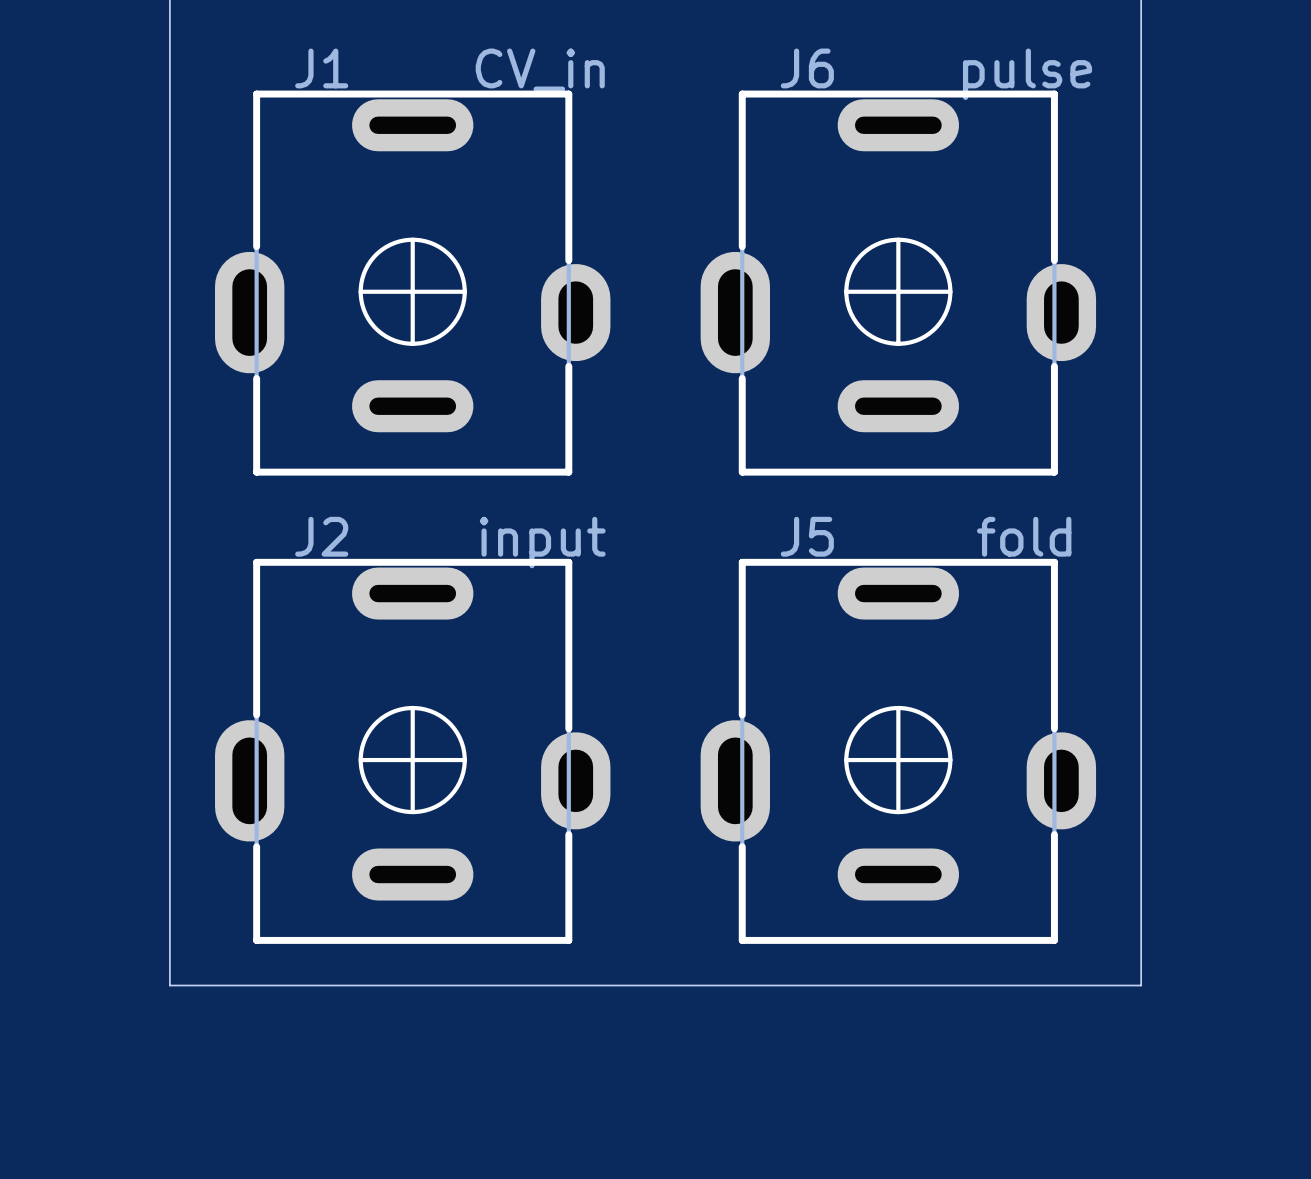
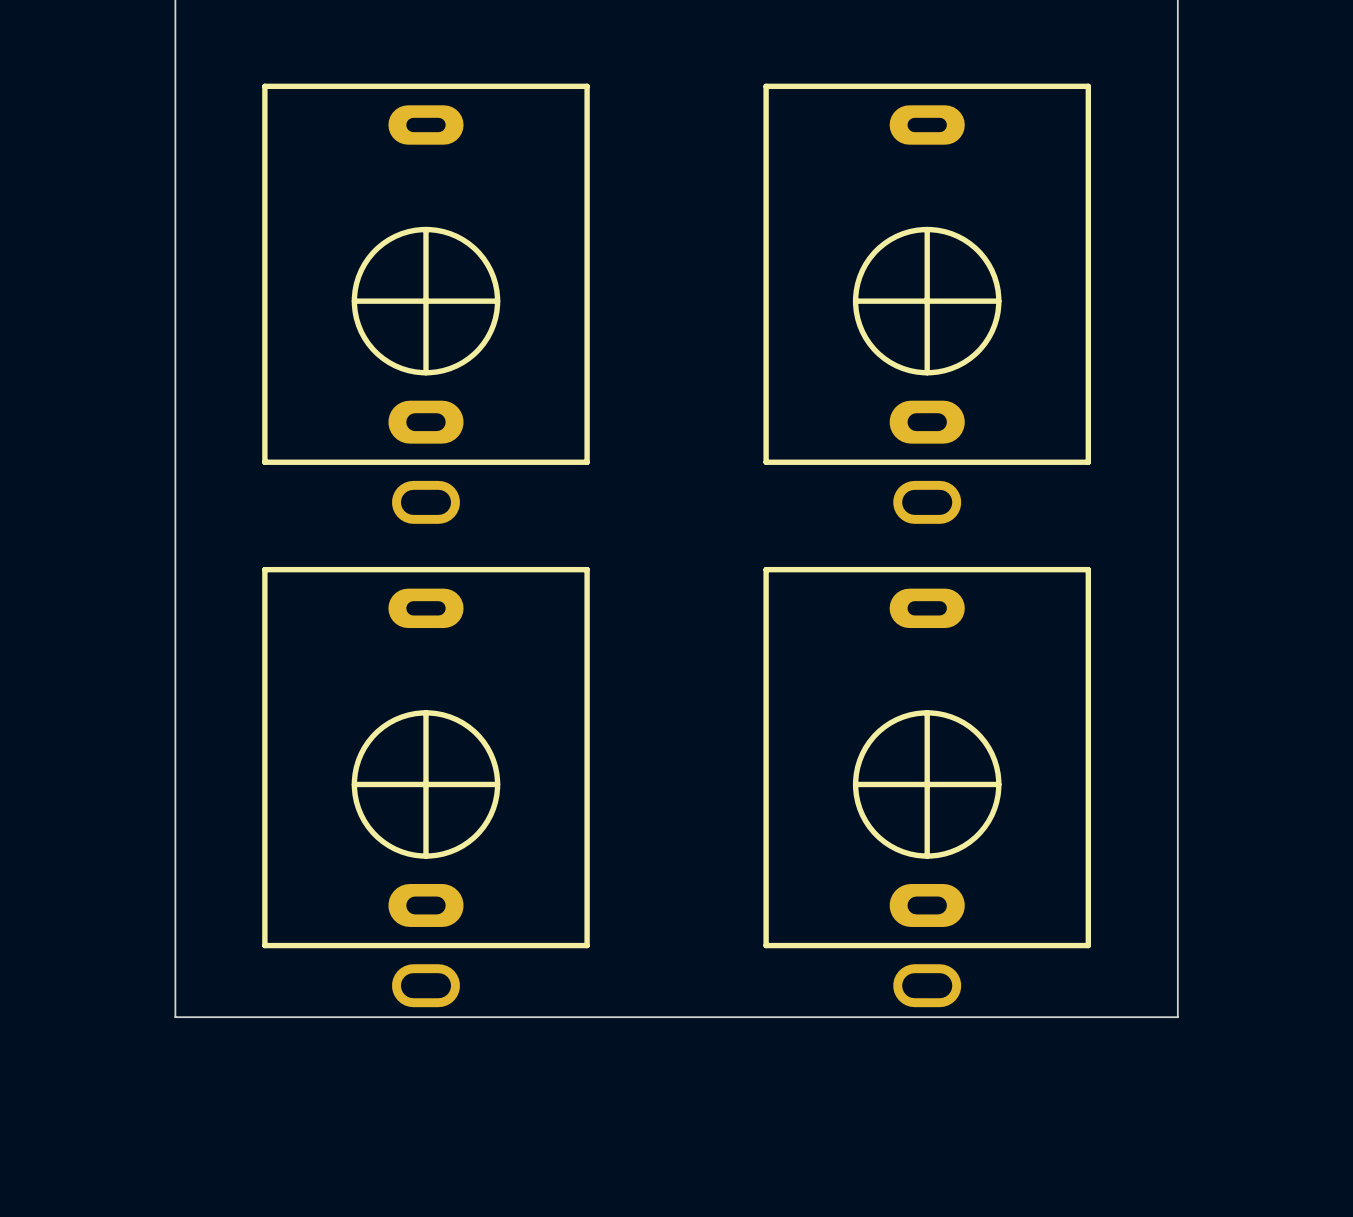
J1: CV_in (412, 283) -> none
J6: pulse (898, 283) -> none
part: none -> (425, 303)
part: none -> (927, 303)
J2: input (412, 751) -> none
J5: fold (898, 751) -> none
part: none -> (425, 787)
part: none -> (927, 787)

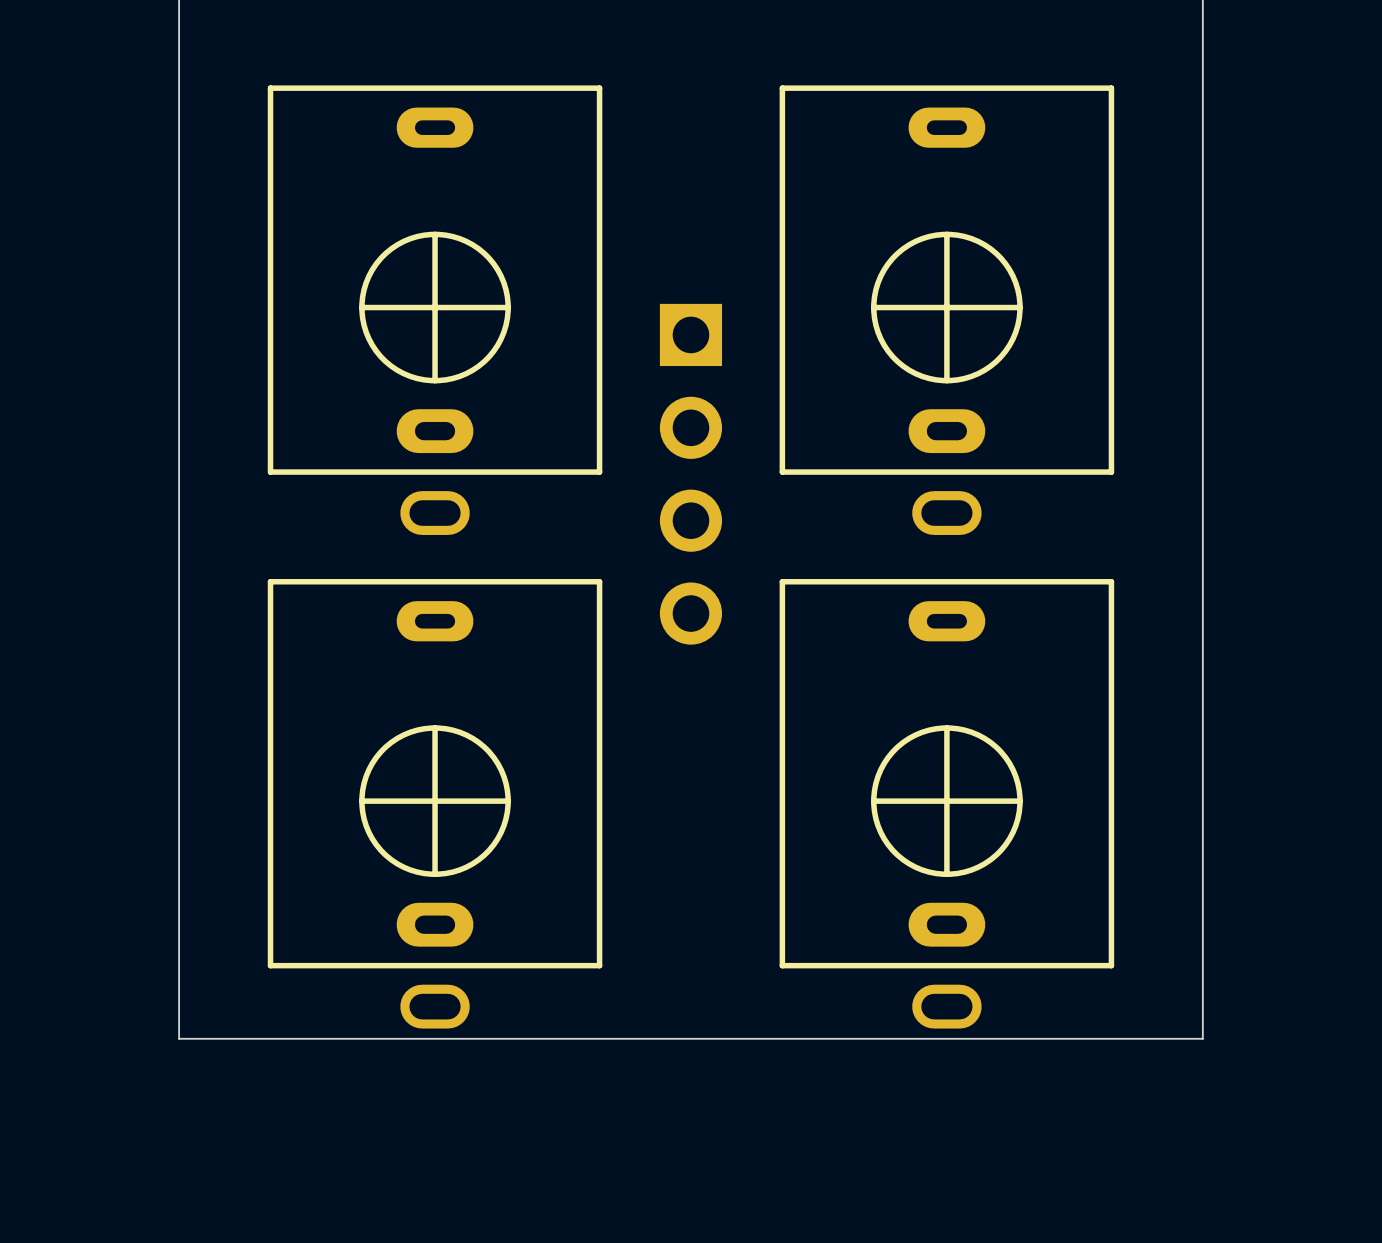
part: none -> (690, 474)

